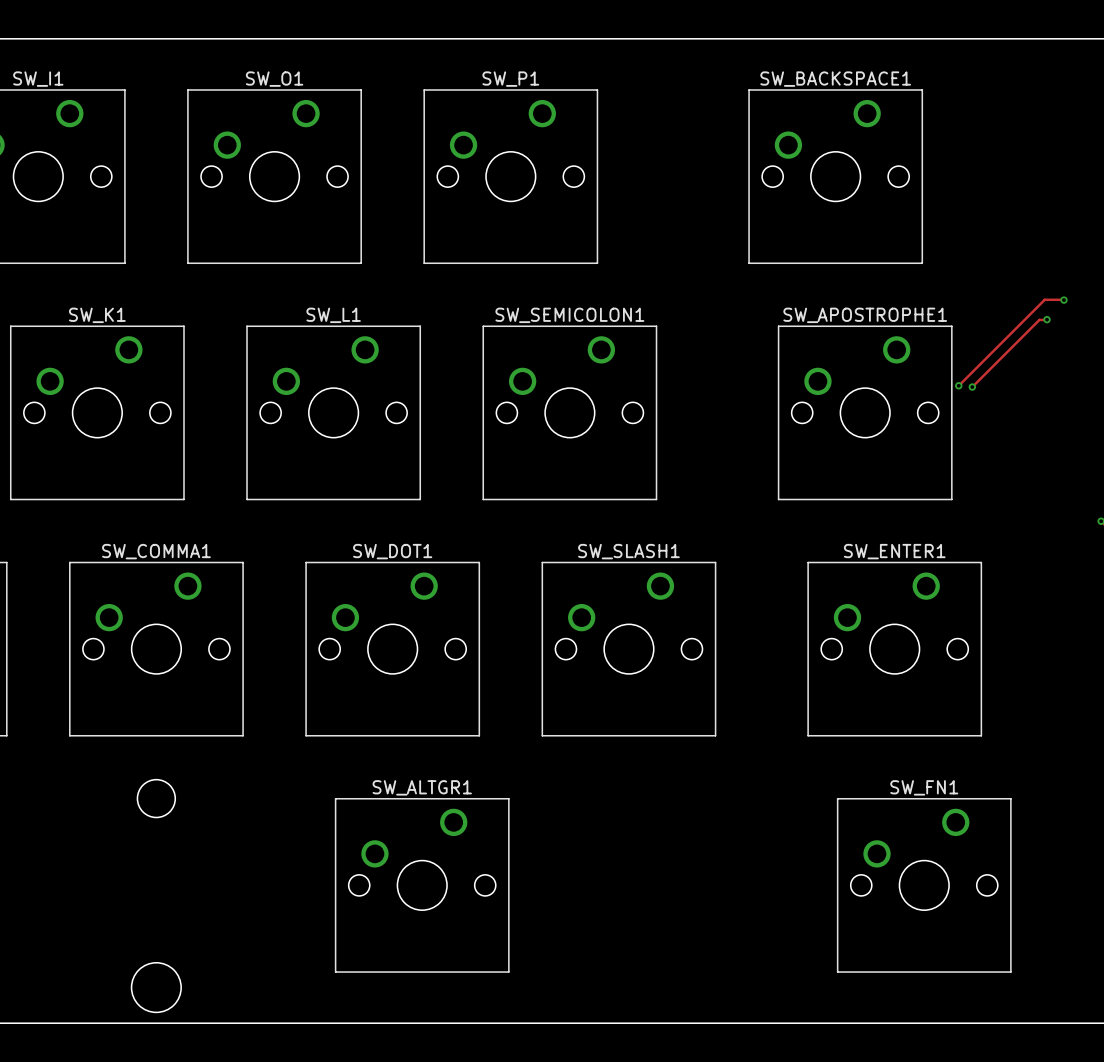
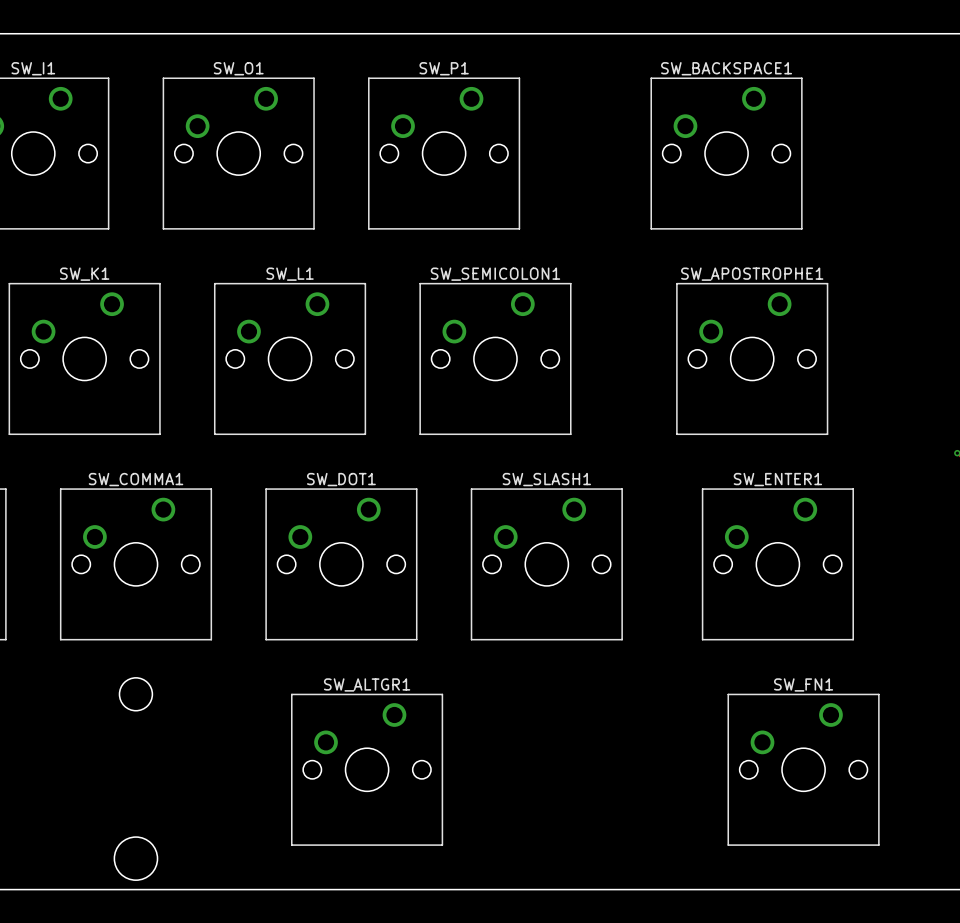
track: (1063, 299) (1044, 299) (958, 385) -> none
via: (1063, 300) -> none
track: (1046, 319) (1039, 319) (972, 387) -> none
via: (1047, 319) -> none
via: (958, 385) -> none
via: (972, 387) -> none

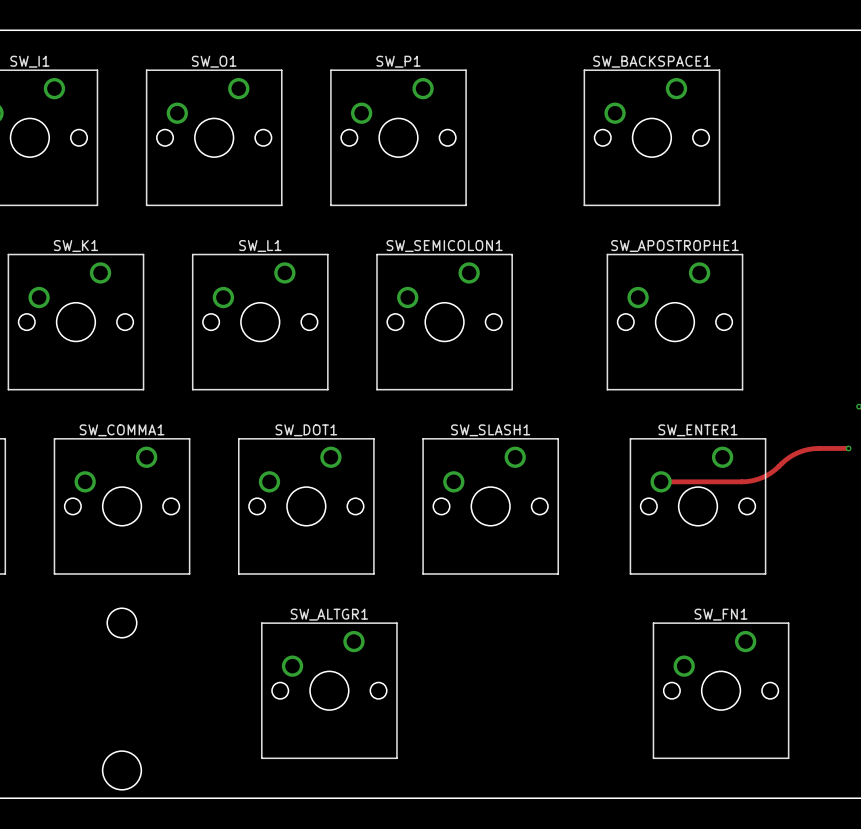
track: none -> (848, 448) (813, 448) (803, 450) (789, 457) (766, 475) (752, 480) (661, 481)
via: none -> (848, 448)

